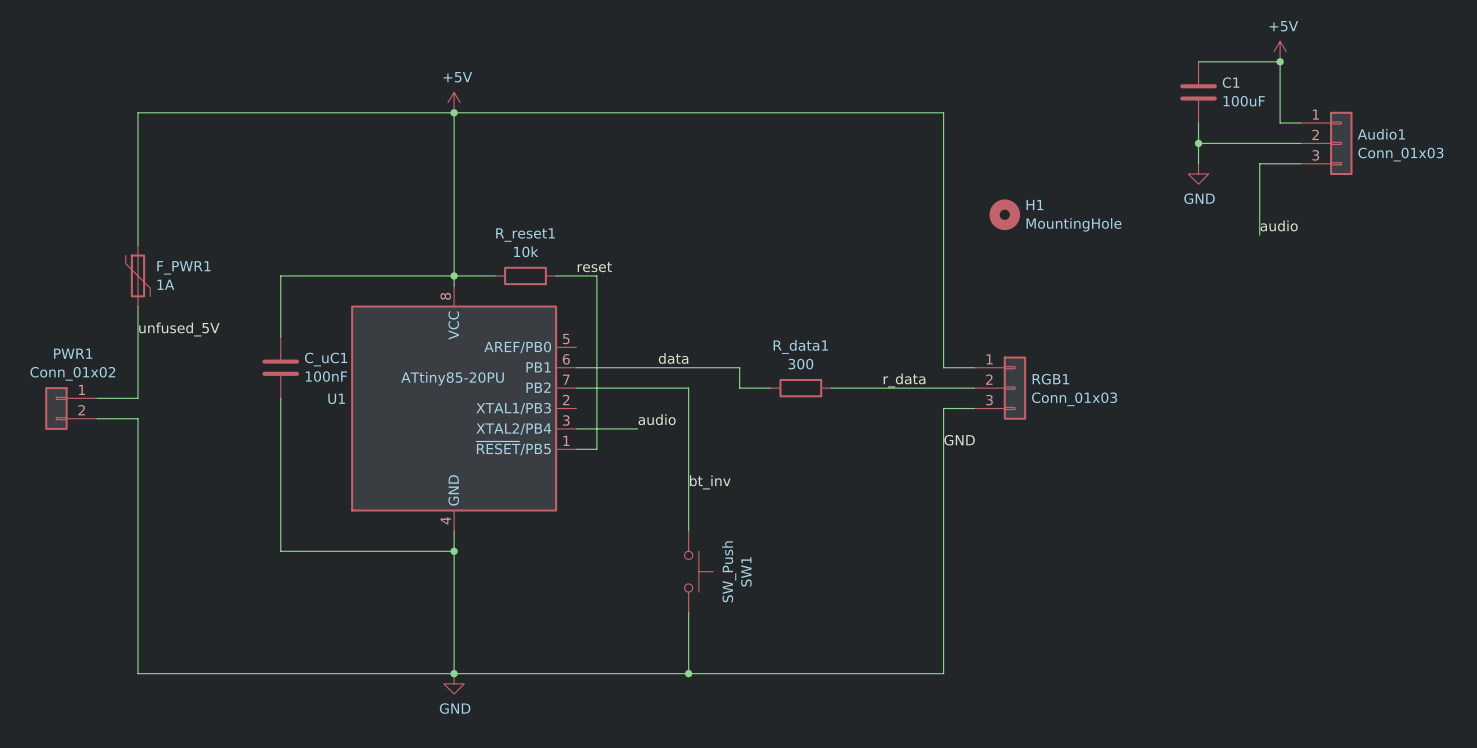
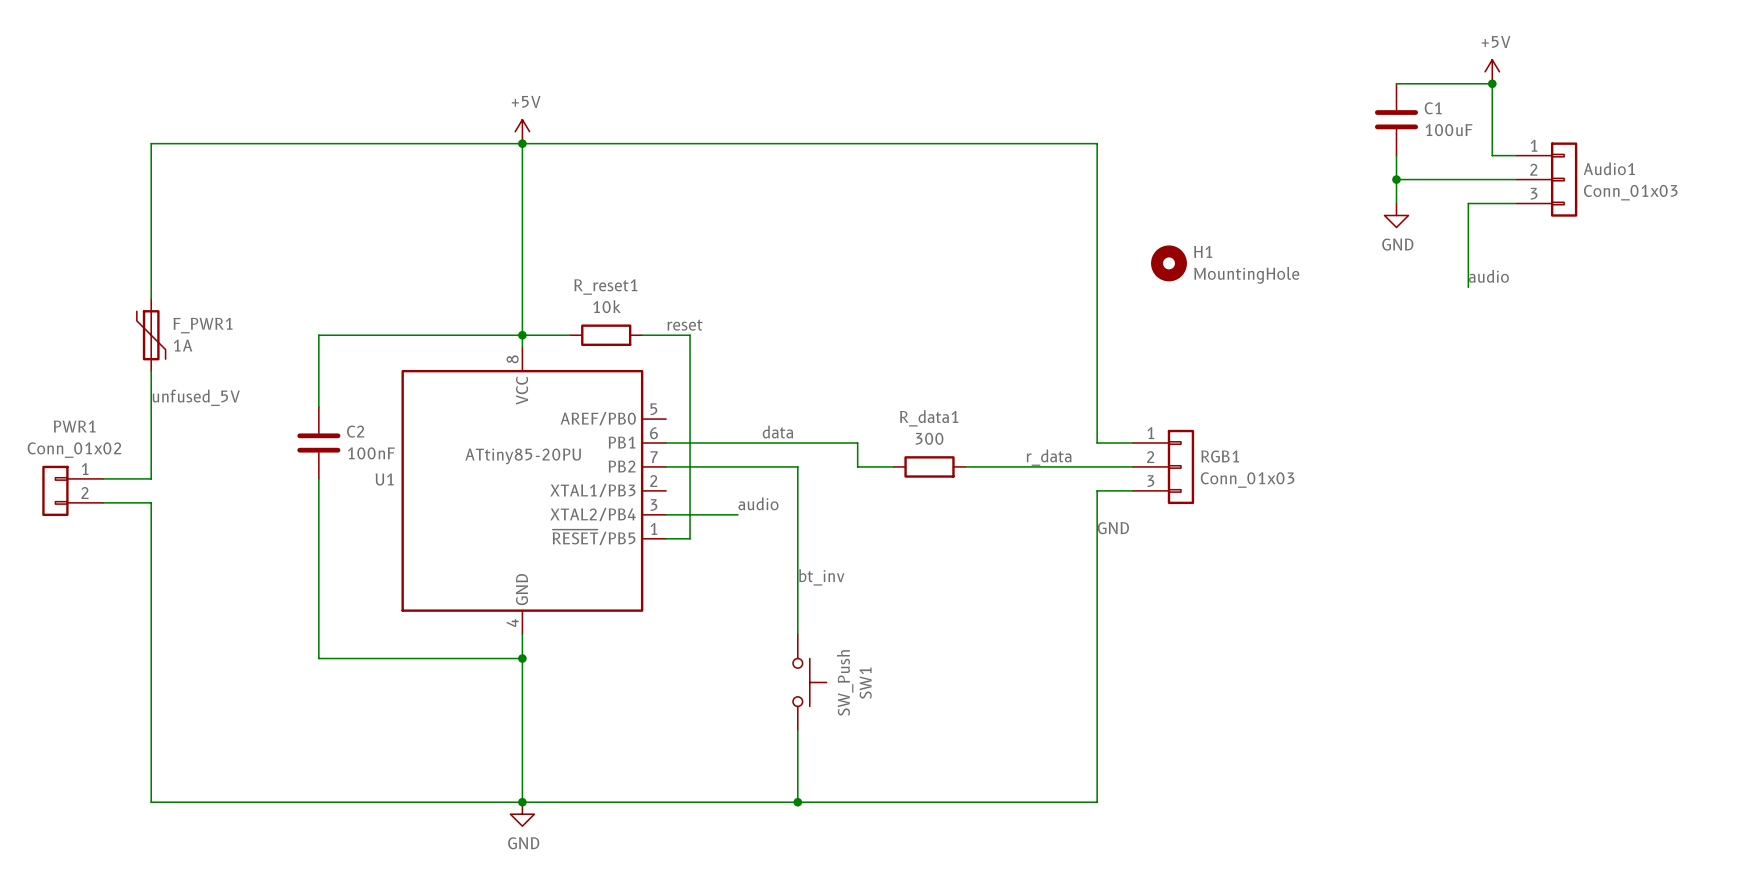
C_uC1 name: C_uC1 (326, 359) -> C2 (355, 431)

